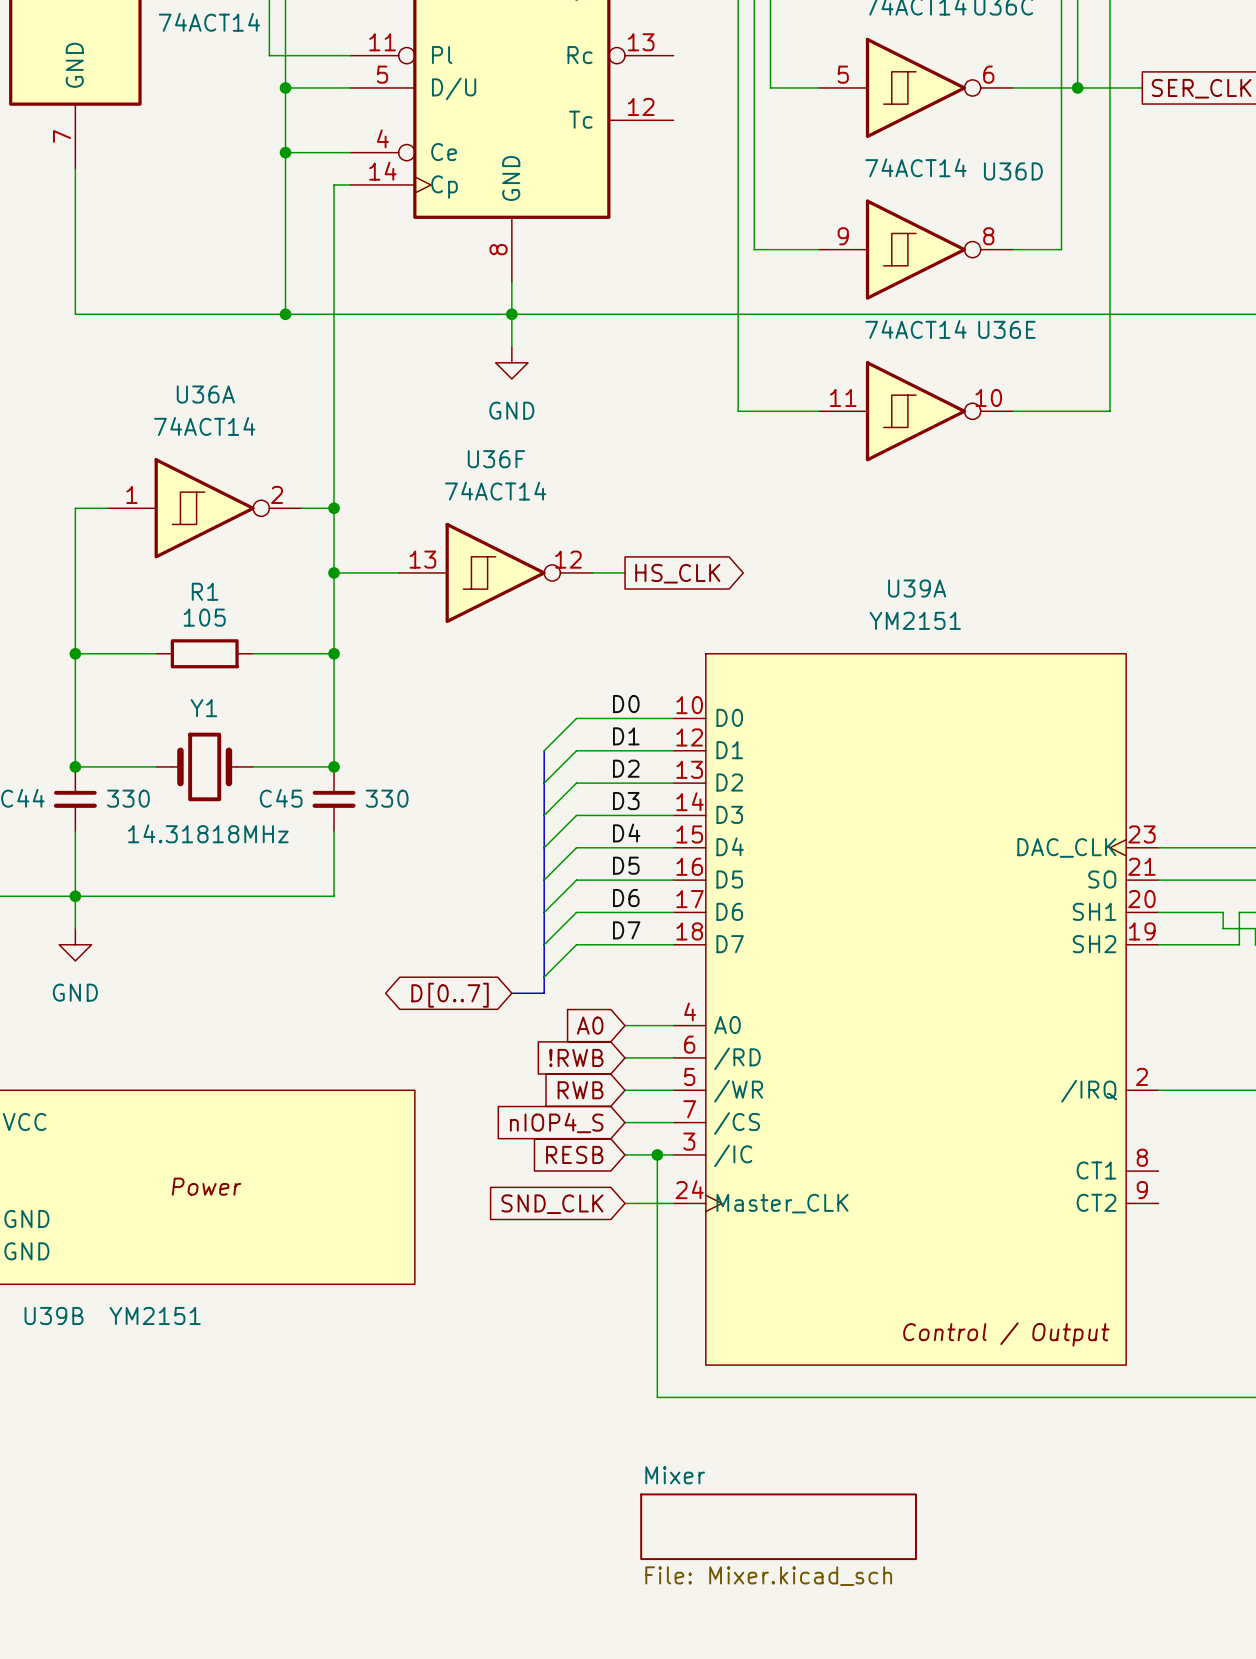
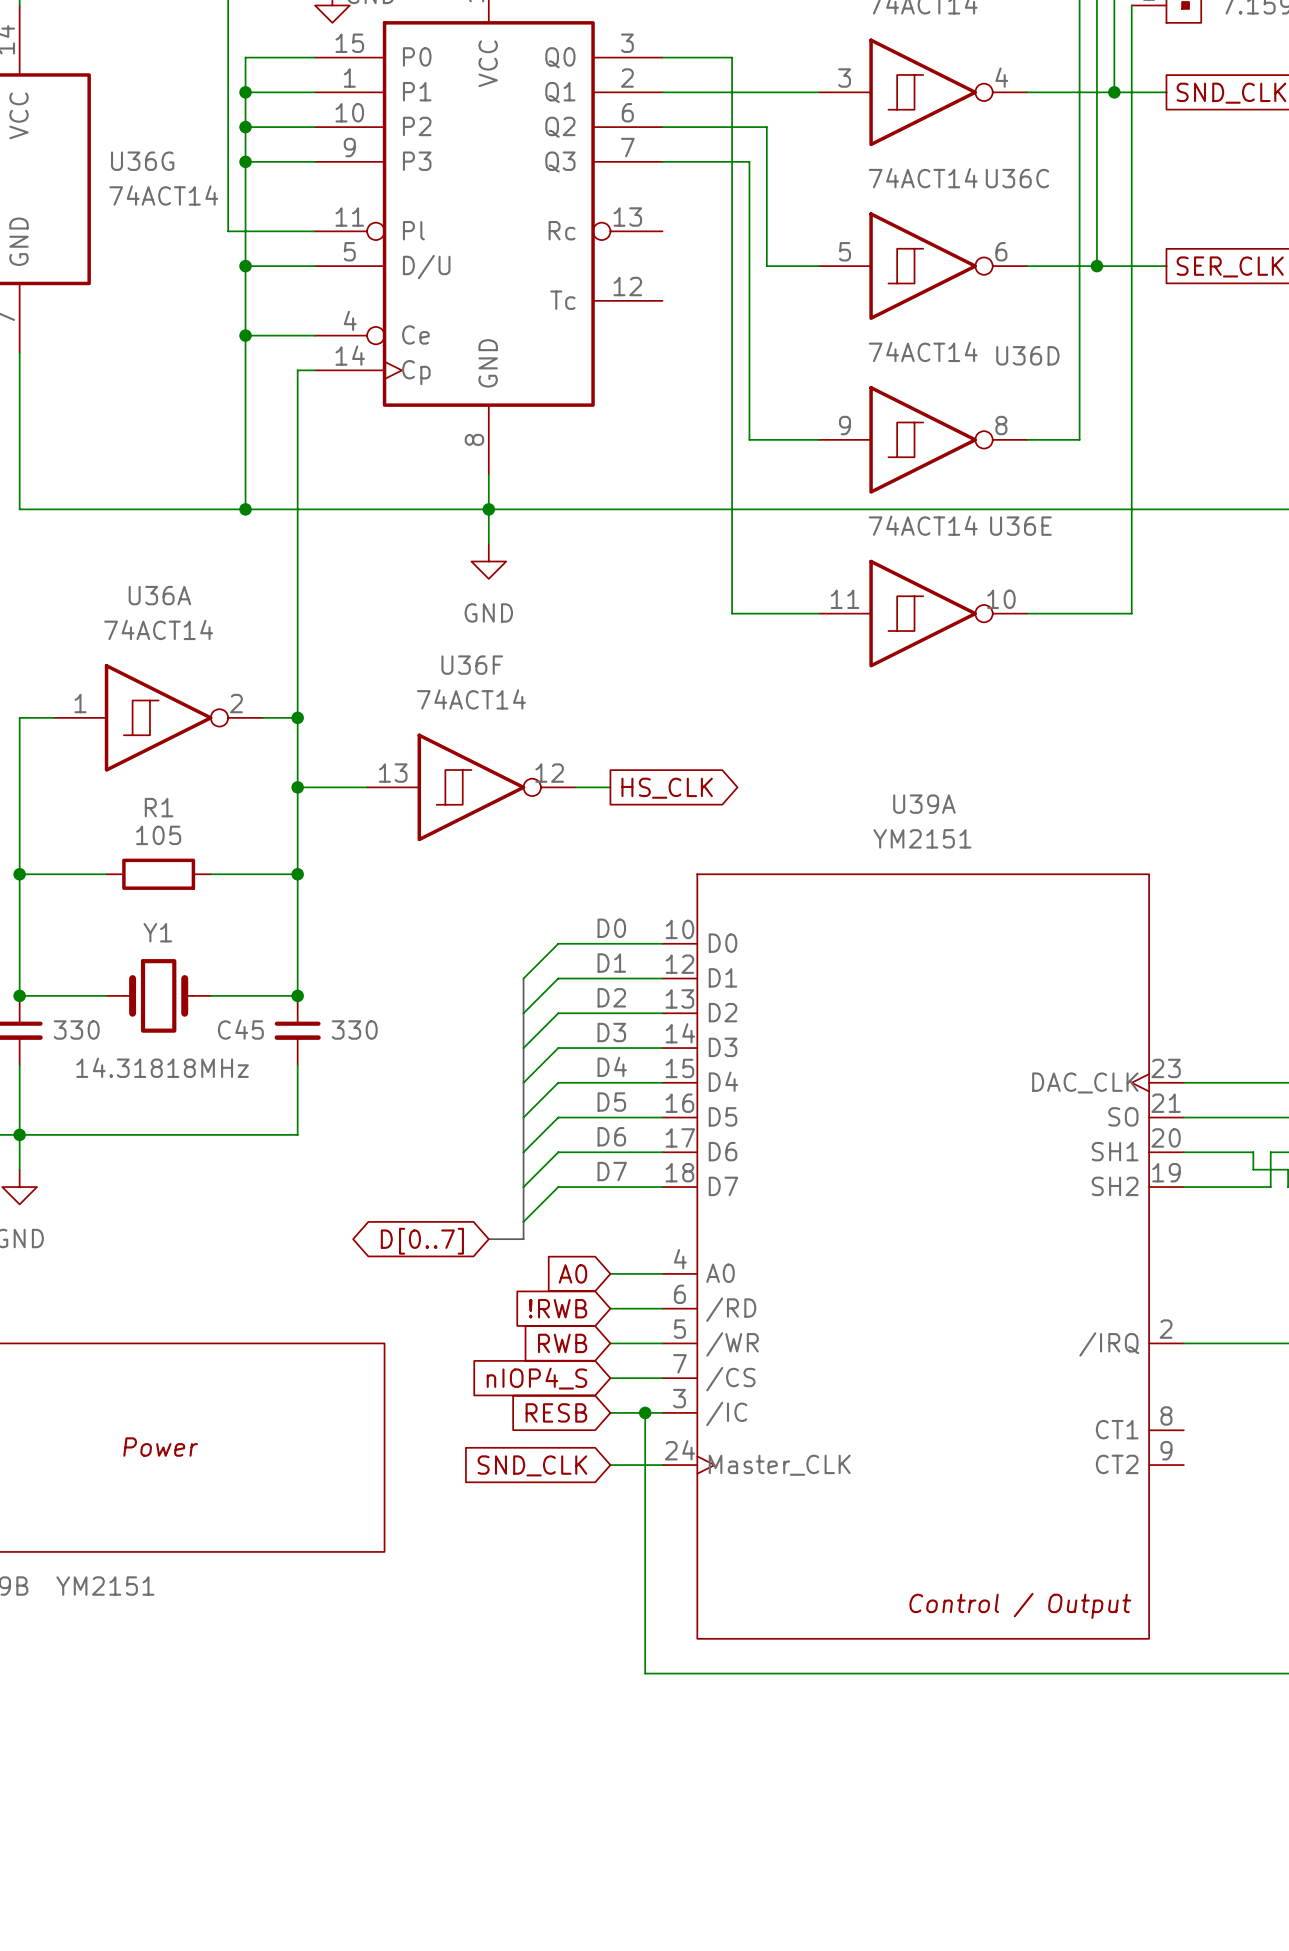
sheet Mixer: File: Mixer.kicad_sch (778, 1526) -> none

